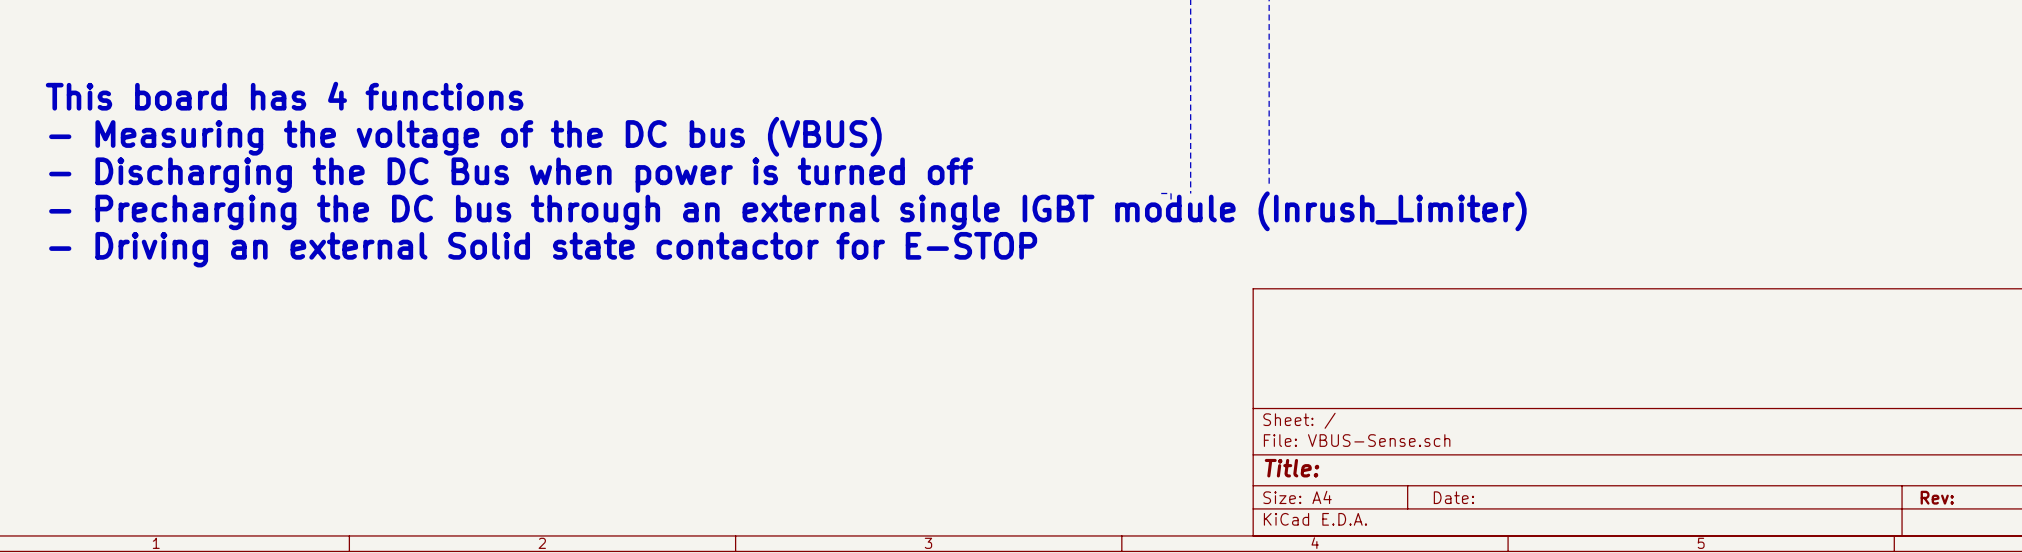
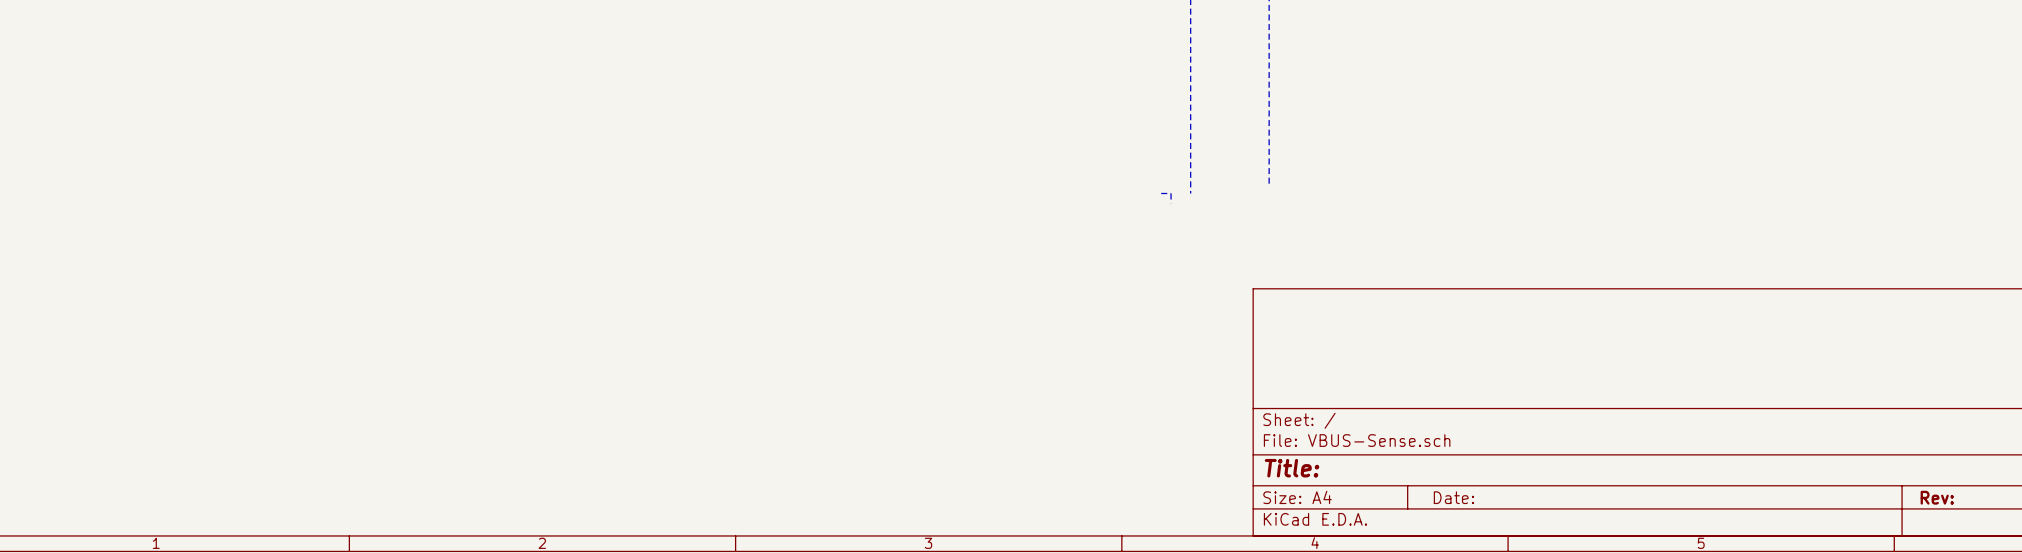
text: This board has 4 functions (284, 96) -> none
text: - Measuring the voltage of the DC bus (VBUS) (465, 136) -> none
text: - Discharging the DC Bus when power is turned off (511, 175) -> none
text: - Precharging the DC bus through an external single IGBT module (Inrush_Limiter) (787, 211) -> none
text: - Driving an external Solid state contactor for E-STOP (543, 249) -> none

